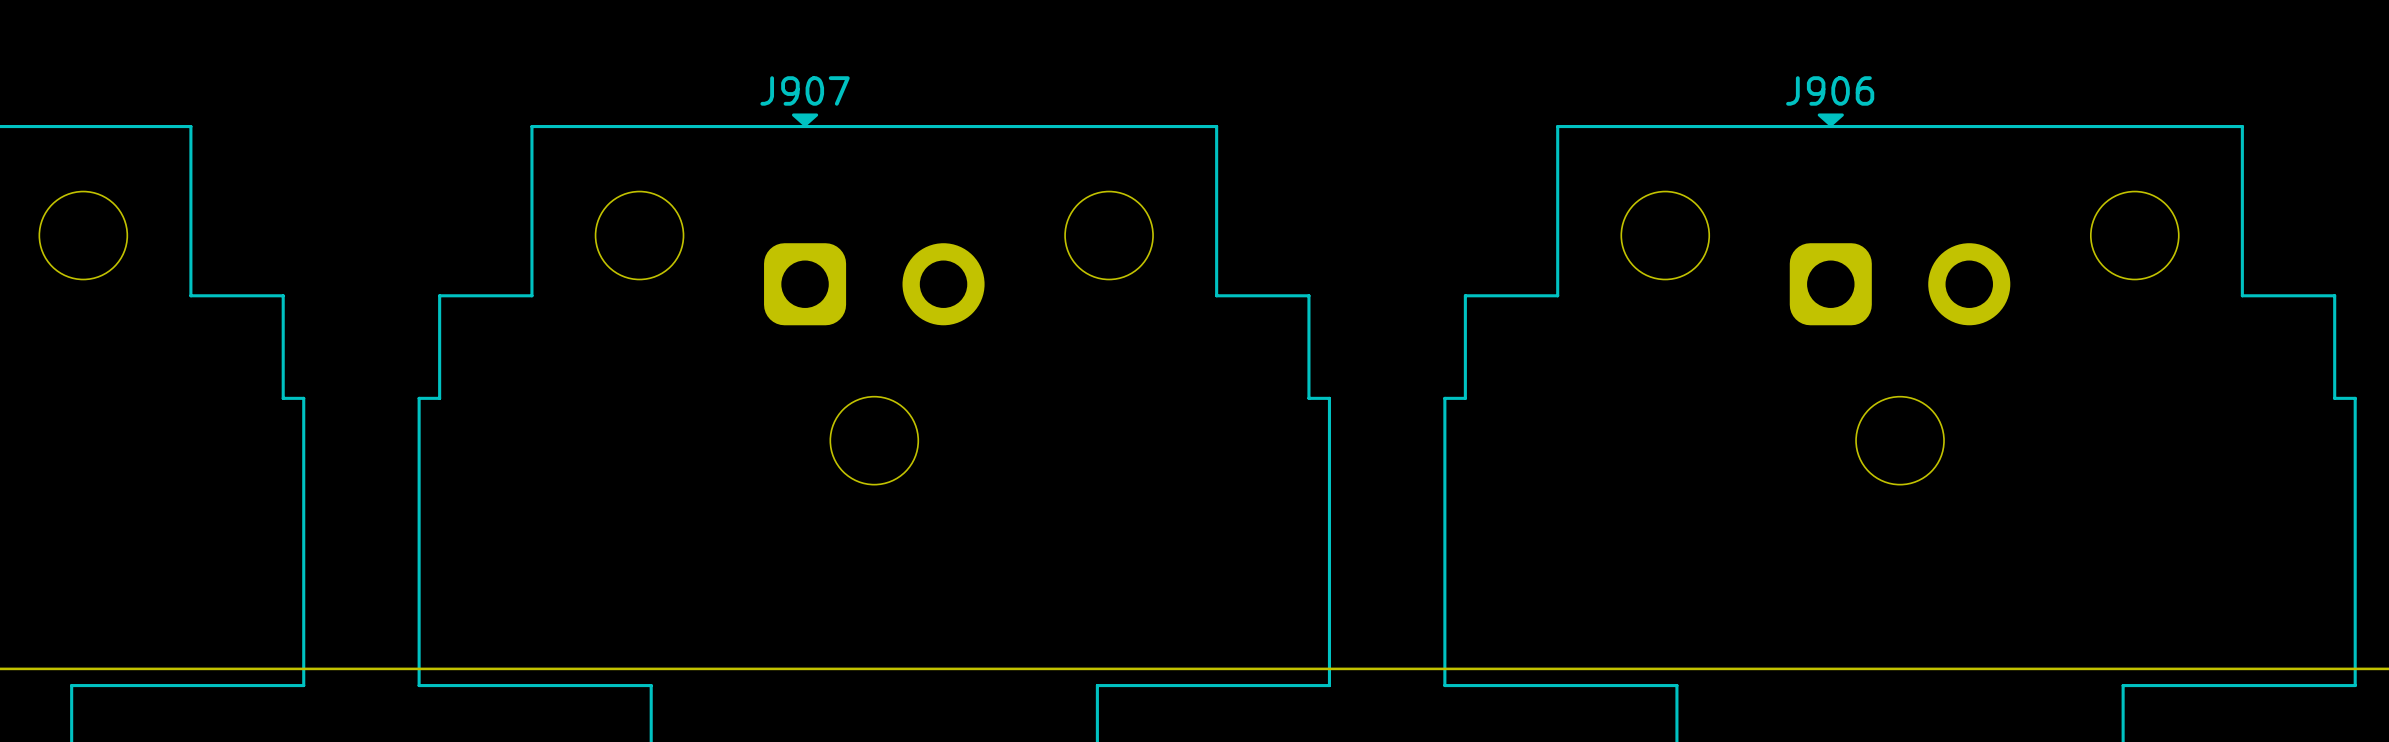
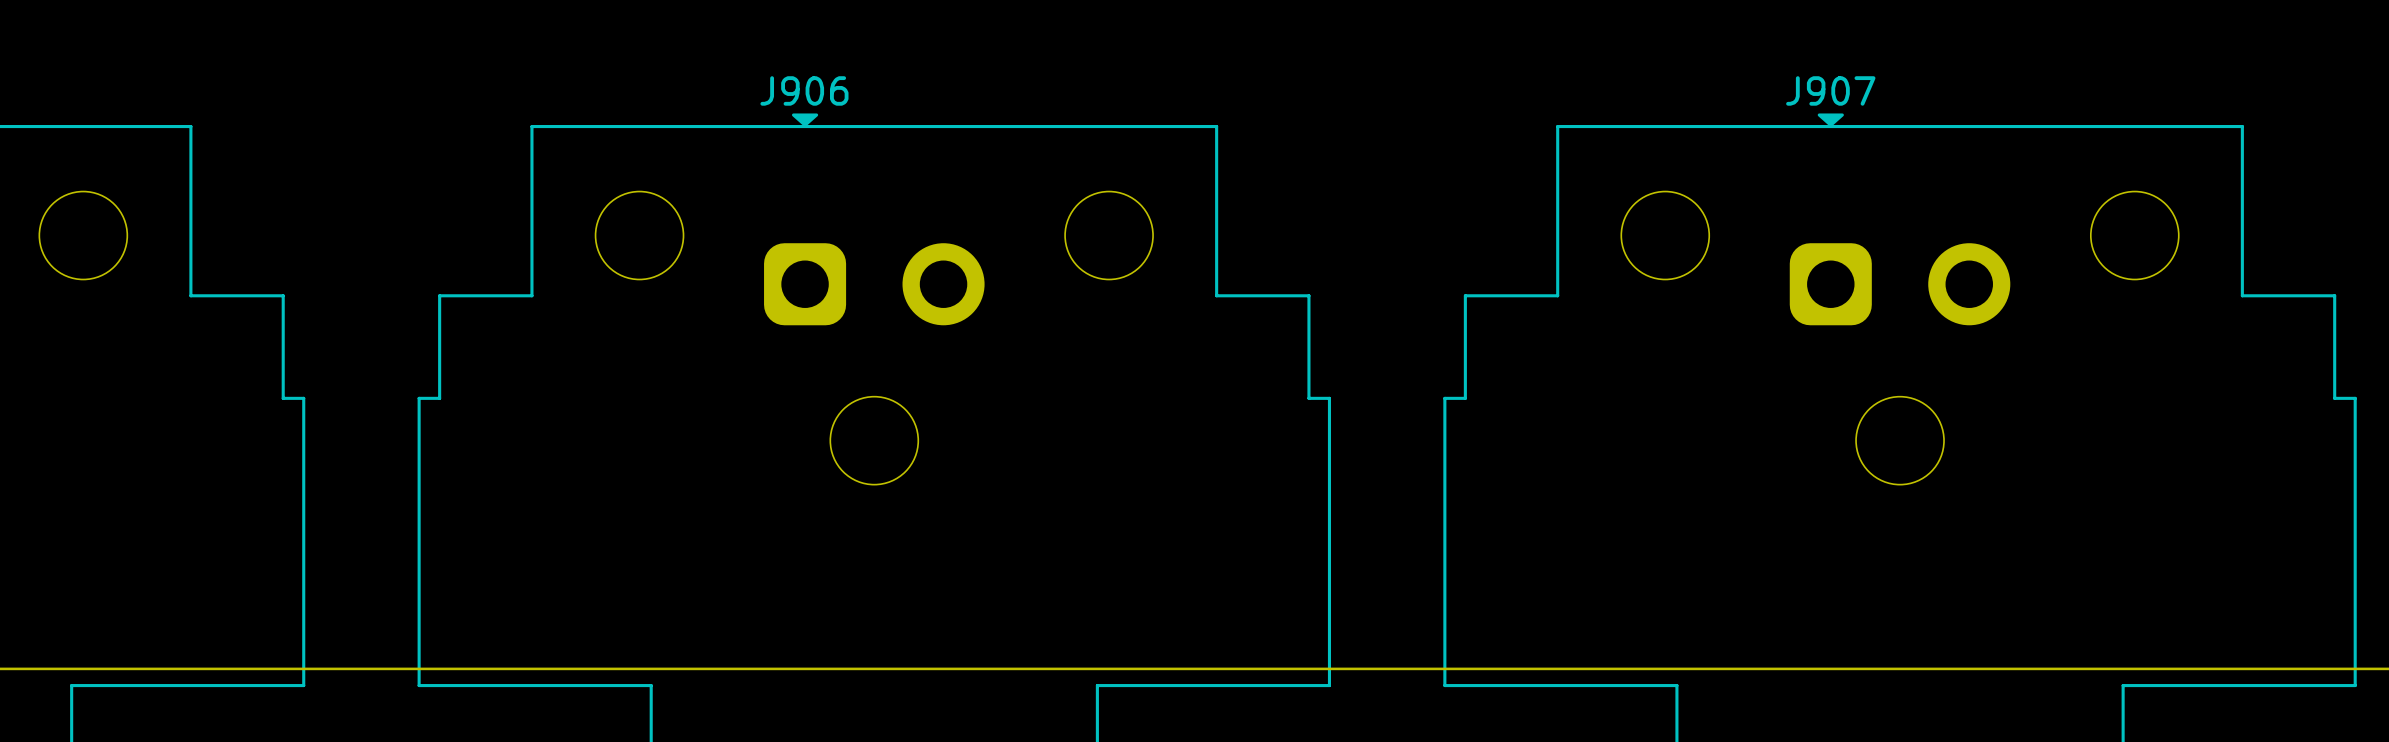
J907 name: J907 (805, 90) -> J906 (804, 90)
J906 name: J906 (1830, 90) -> J907 (1830, 90)

